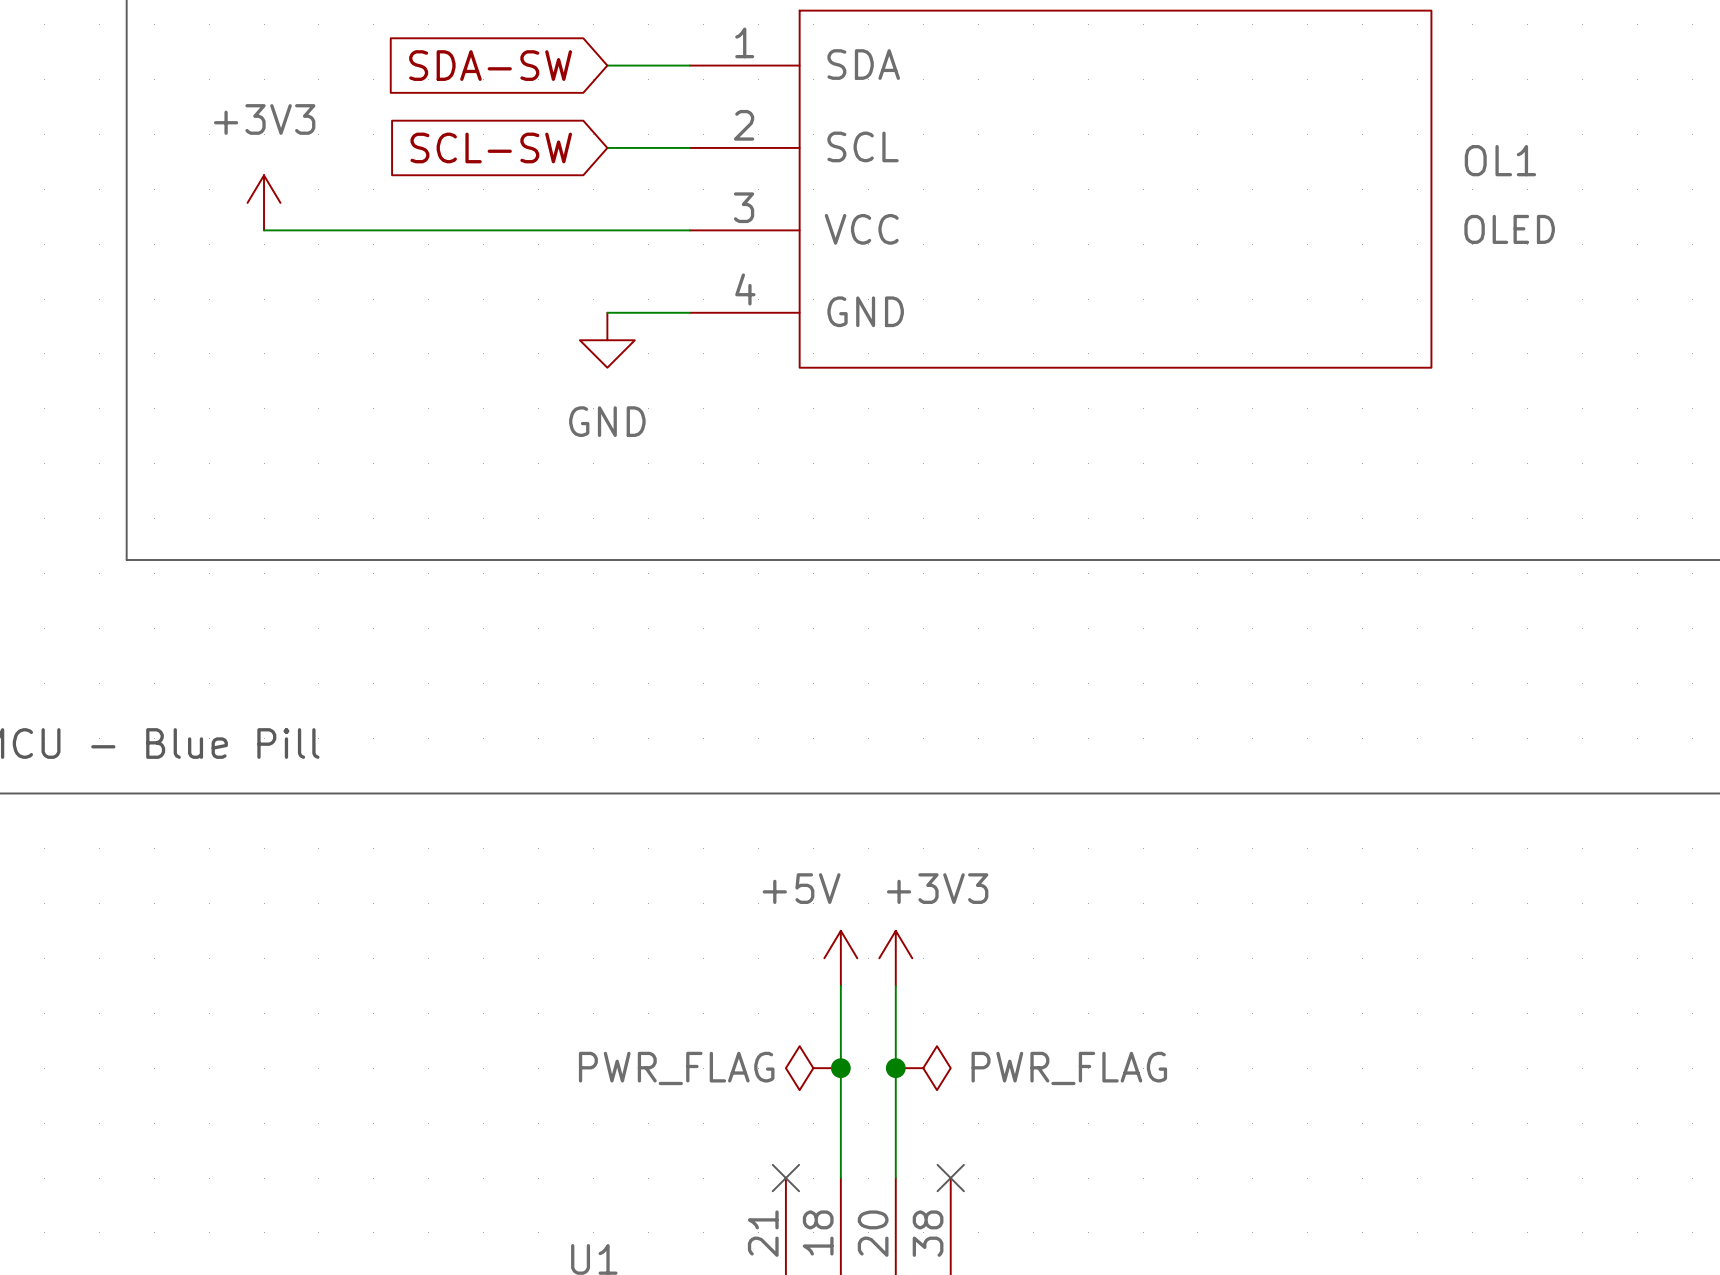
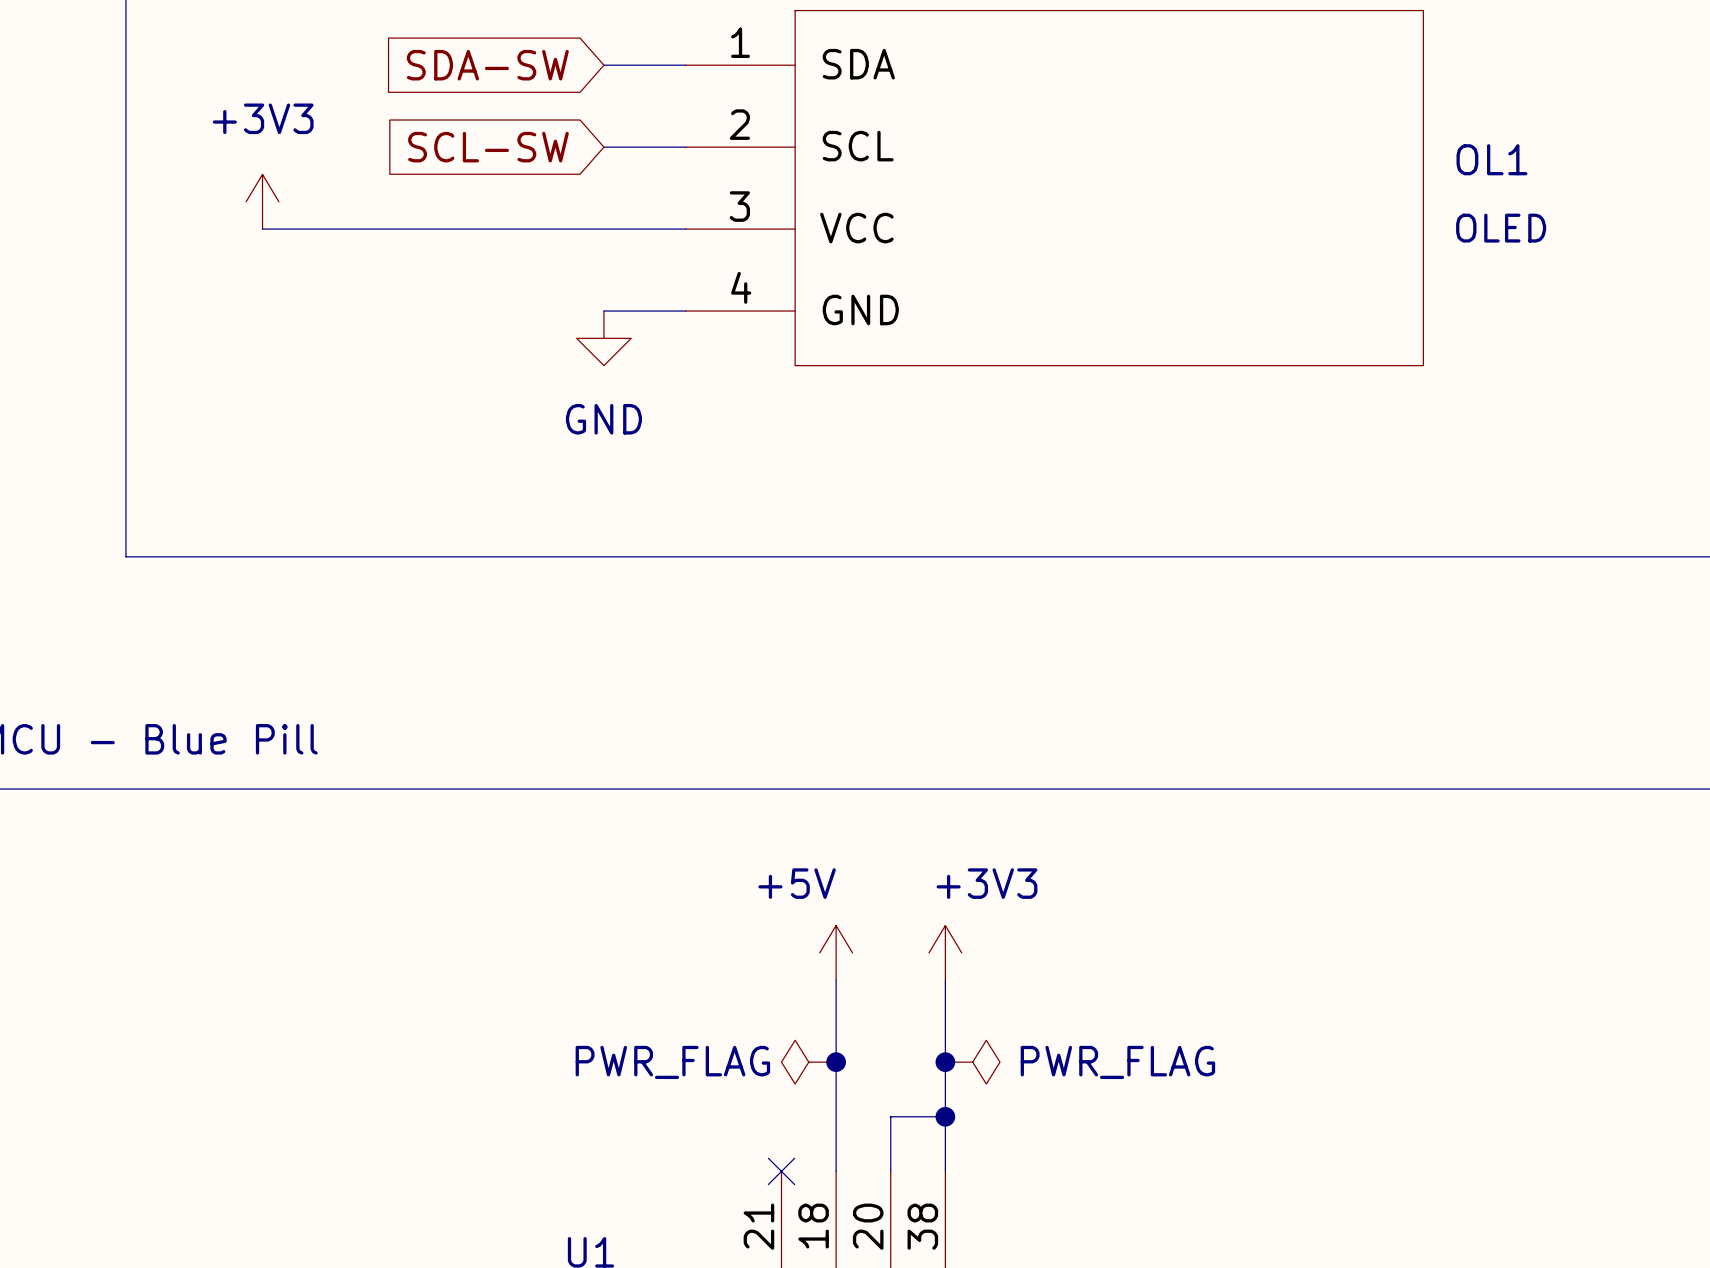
power symbol position: +3V3 (895, 958) -> +3V3 (945, 952)
wire: (895, 985) (895, 1123) -> (945, 1116) (890, 1116)
wire: none -> (945, 980) (945, 1171)
junction: (895, 1068) -> none
power symbol position: PWR_FLAG (923, 1068) -> PWR_FLAG (972, 1062)
junction: none -> (945, 1062)
junction: none -> (945, 1116)
no-connect mark: (950, 1178) -> none

